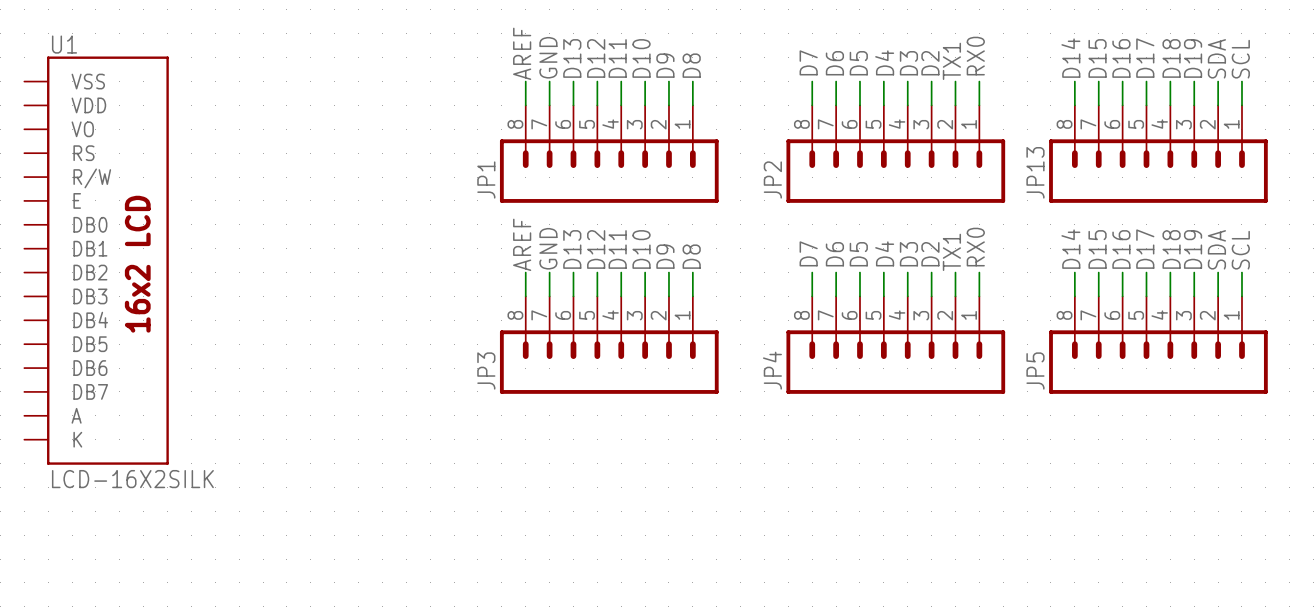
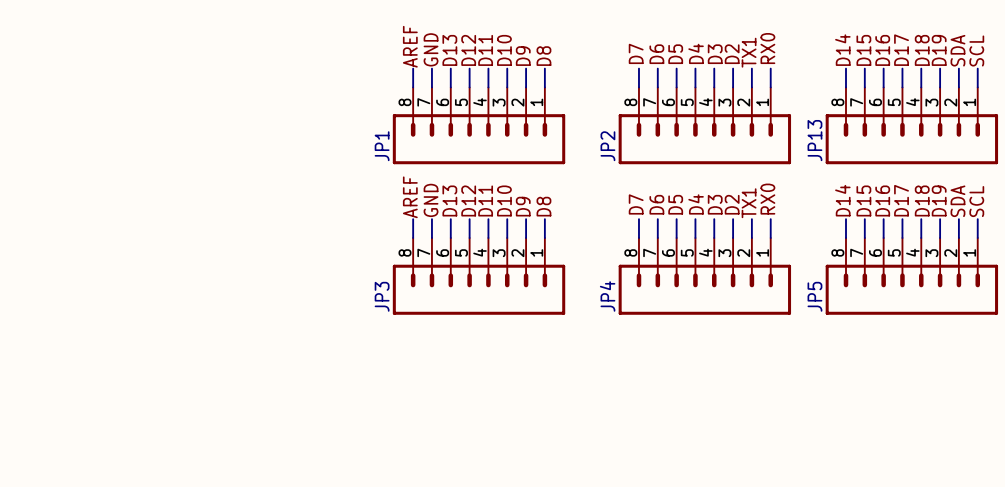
U1: LCD-16X2SILK (96, 260) -> none

